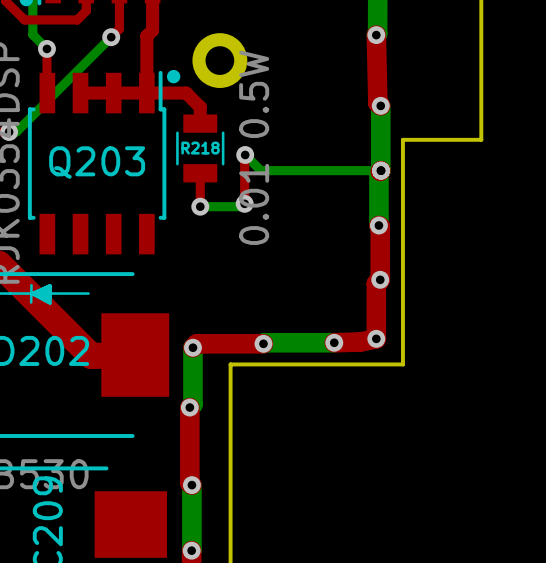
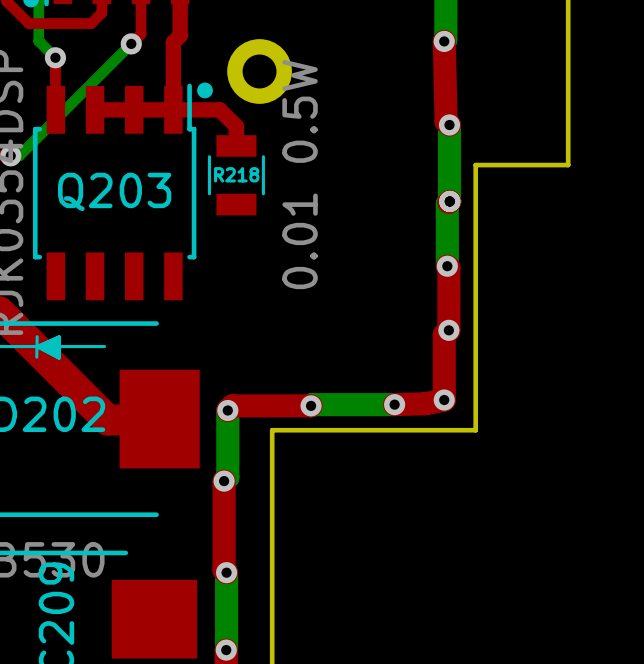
top track: (245, 154) (244, 203) -> none
bottom track: (245, 154) (260, 170) (381, 170) -> none
via: (245, 154) -> none
top track: (200, 173) (200, 206) -> none
bottom track: (244, 203) (241, 206) (200, 206) -> none
via: (244, 203) -> none
via: (200, 206) -> none

